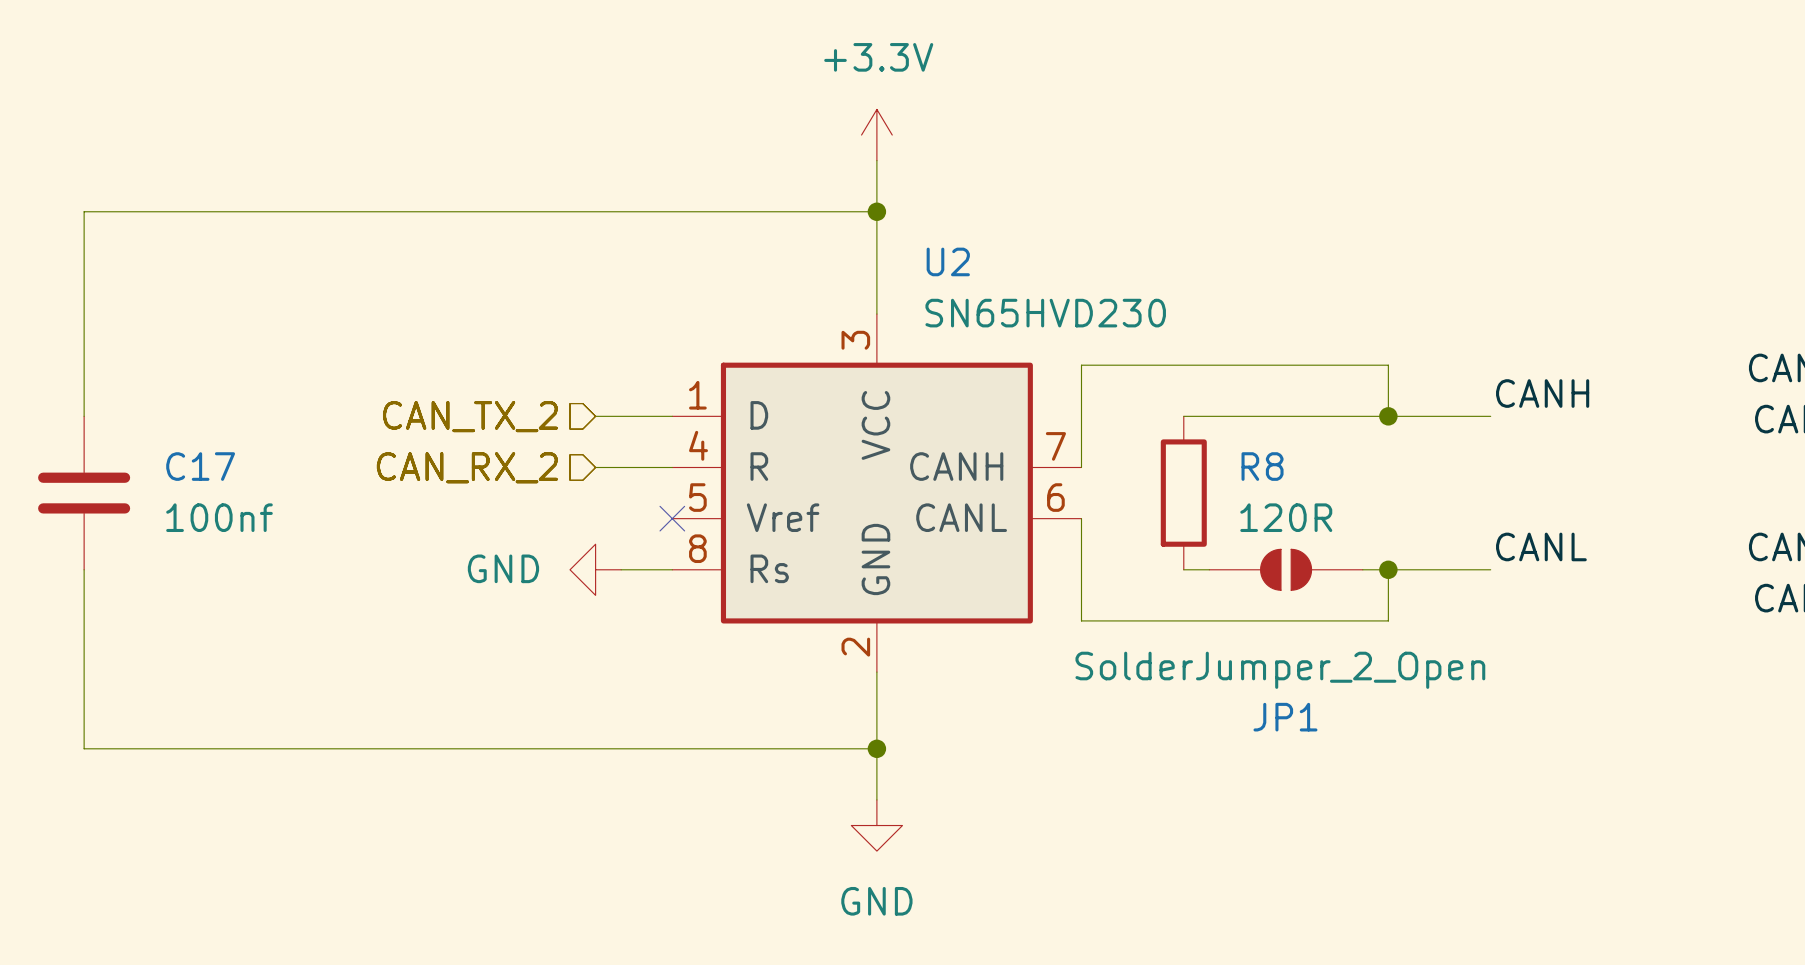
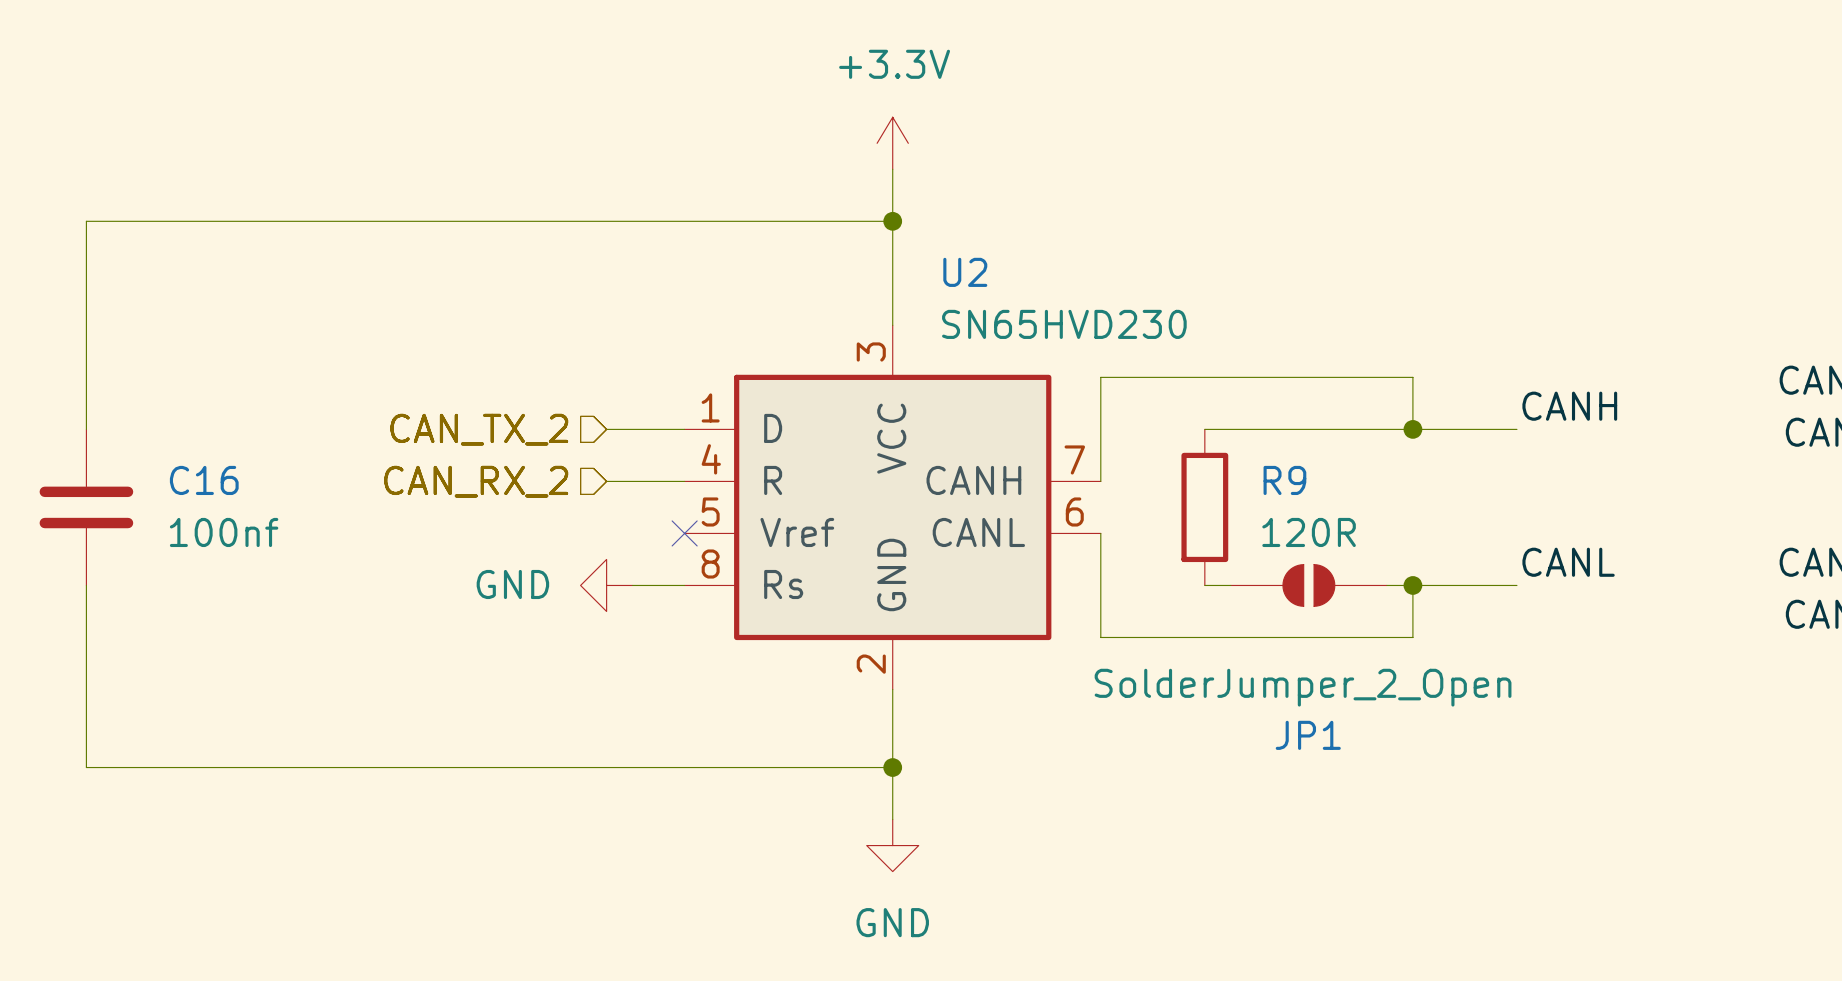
C17 name: C17 (200, 466) -> C16 (204, 480)
R8 name: R8 (1262, 466) -> R9 (1284, 480)

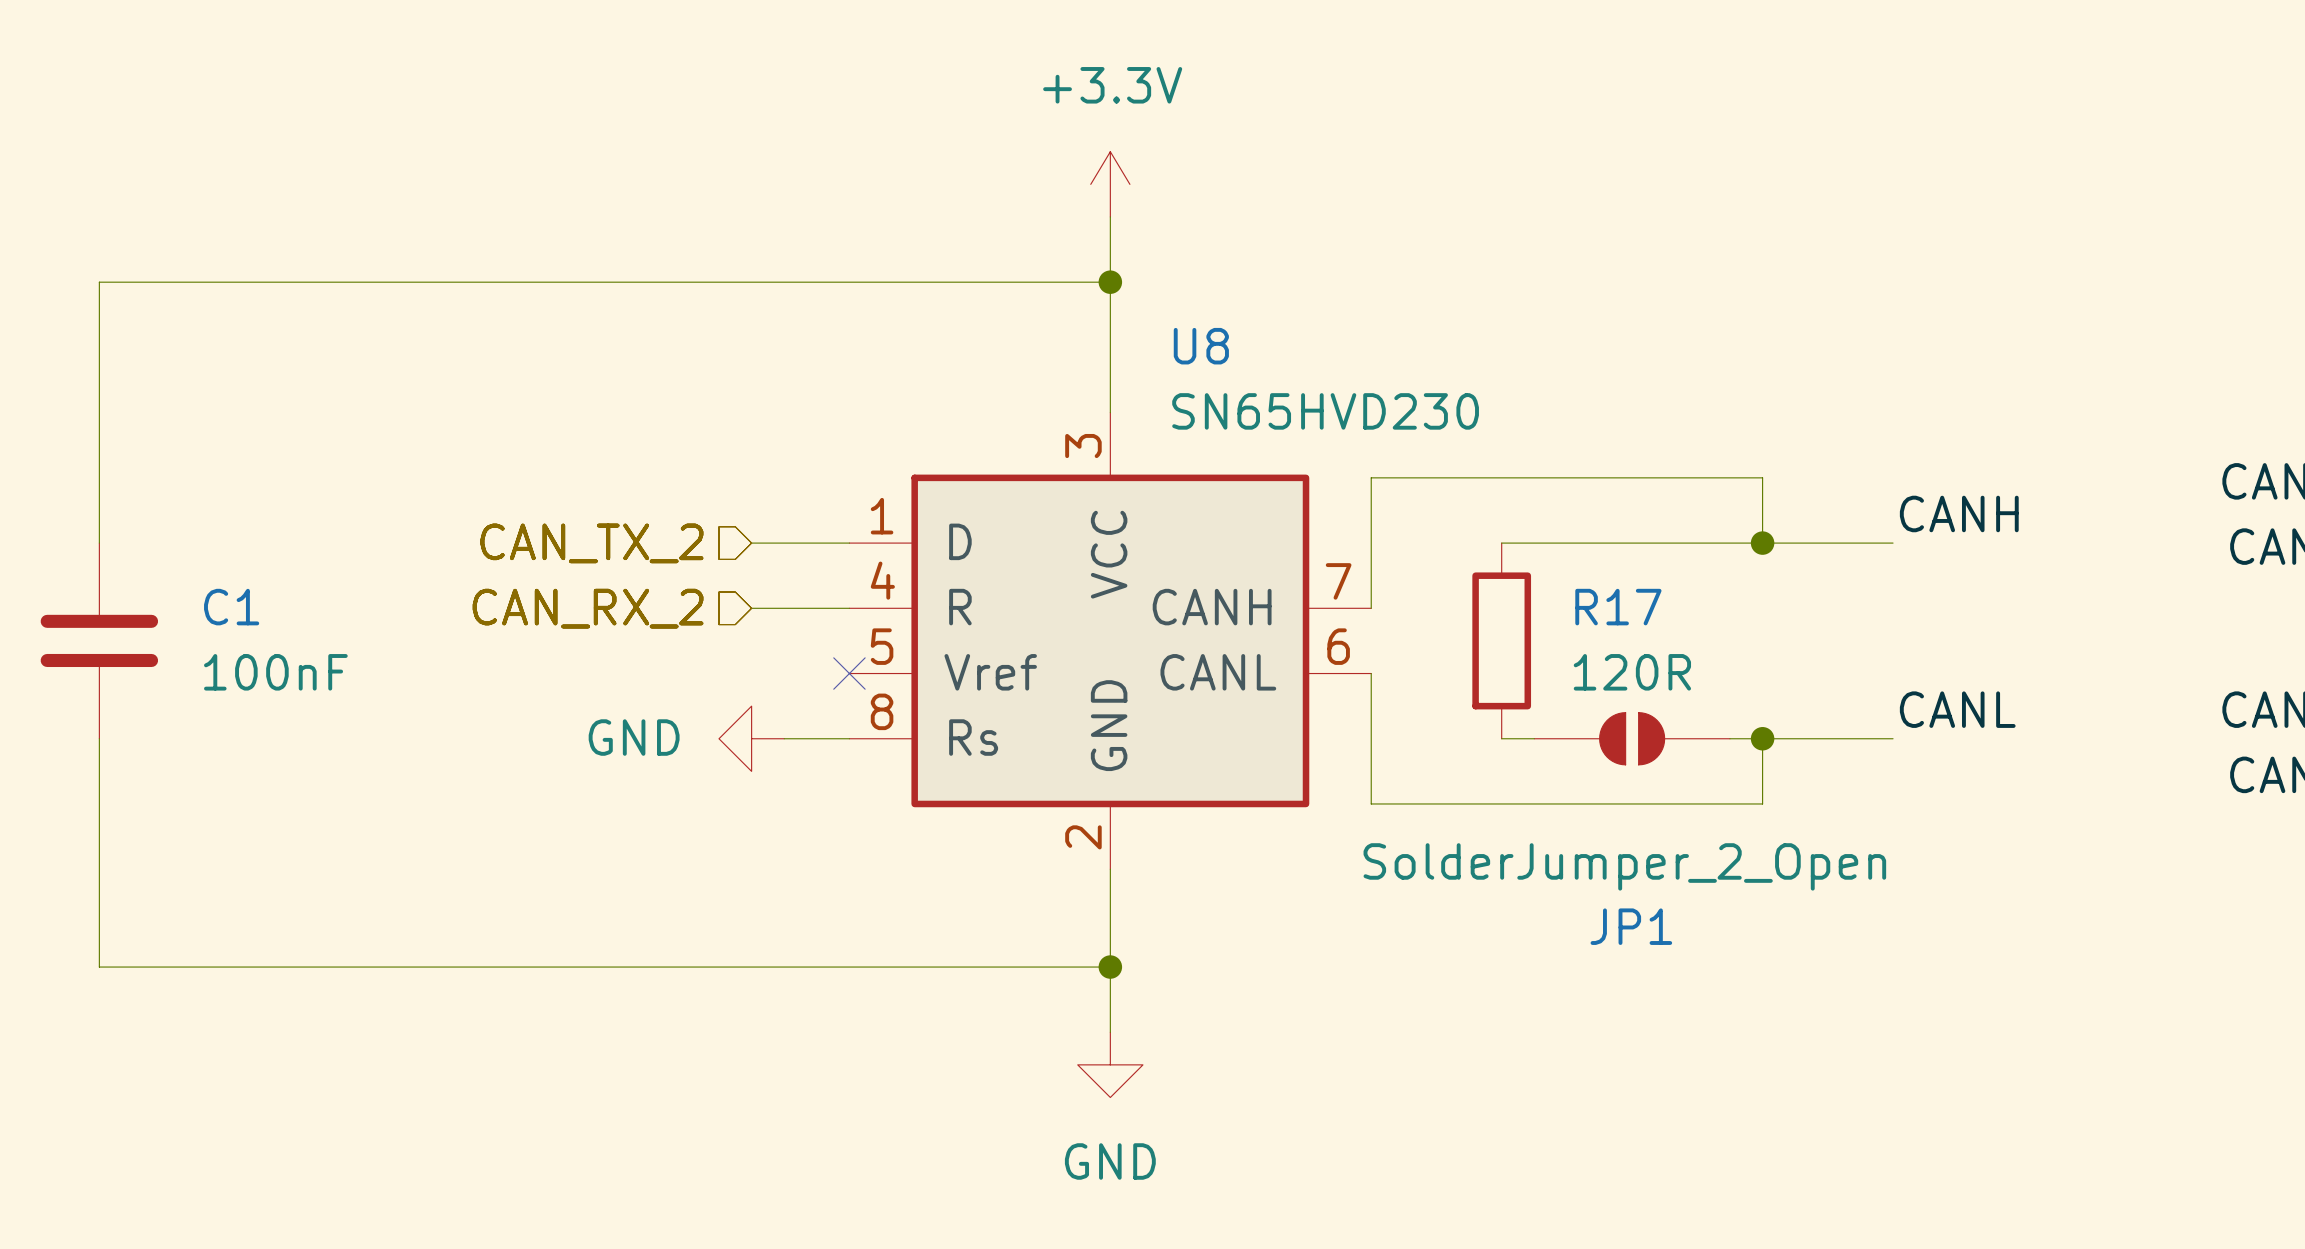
U2 name: U2 (965, 272) -> U8 (1201, 346)
C16 name: C16 (204, 480) -> C1 (231, 607)
R9 name: R9 (1284, 480) -> R17 (1618, 607)
C16 value: 100nf (224, 532) -> 100nF (275, 672)

